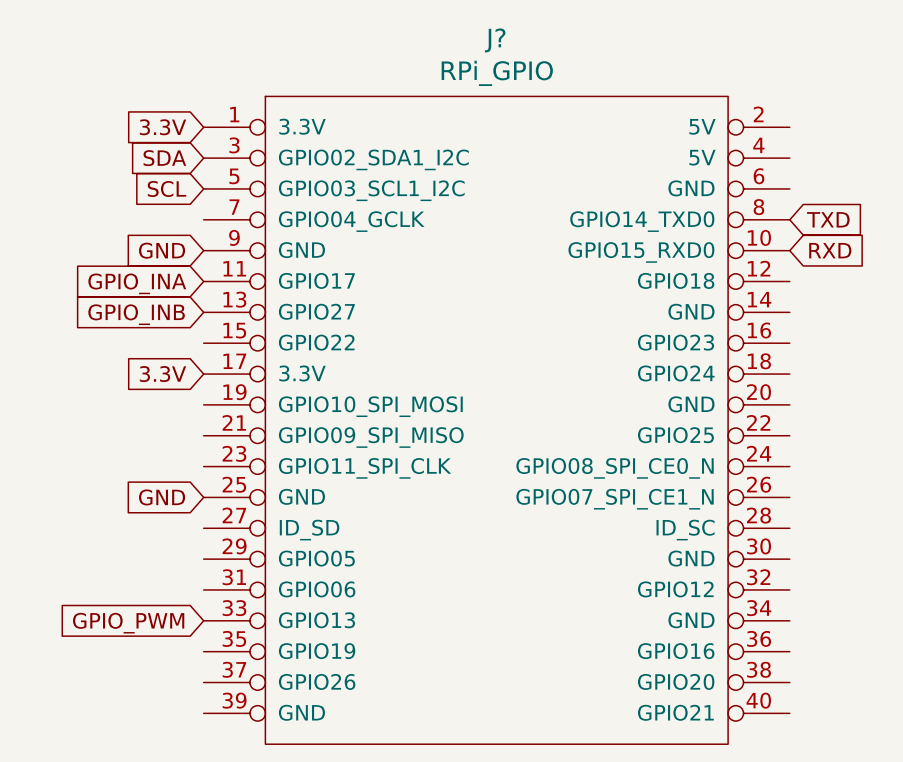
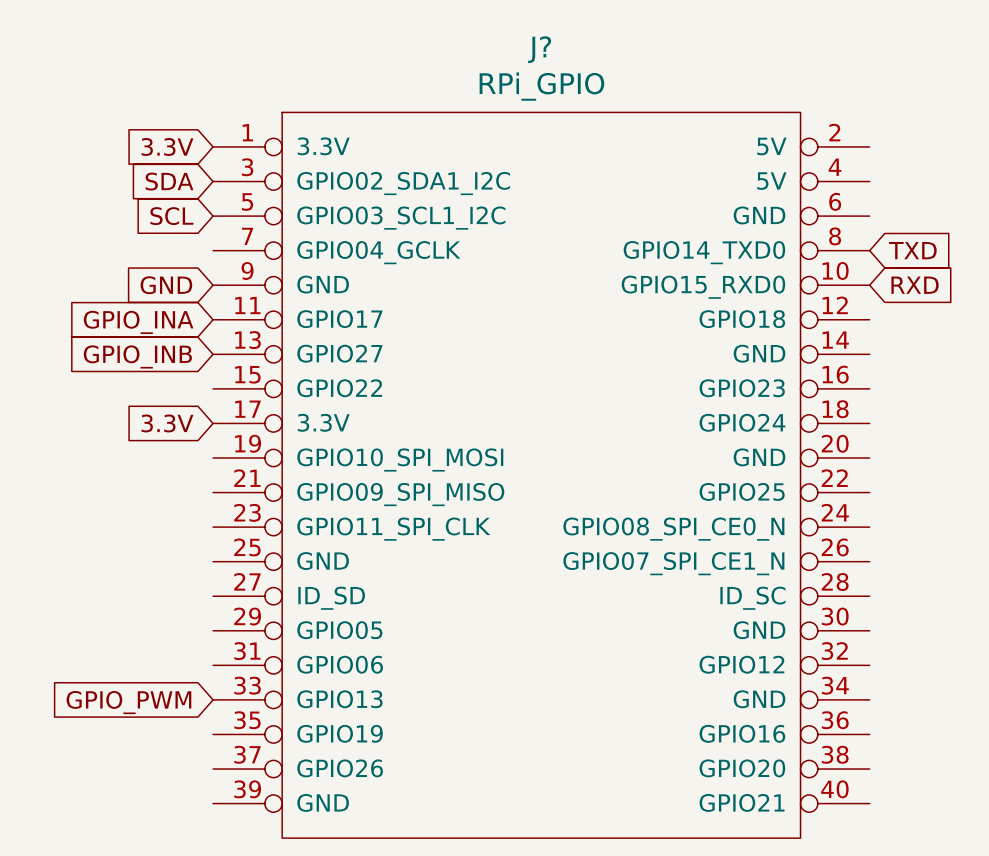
global label: GND (162, 497) -> none

